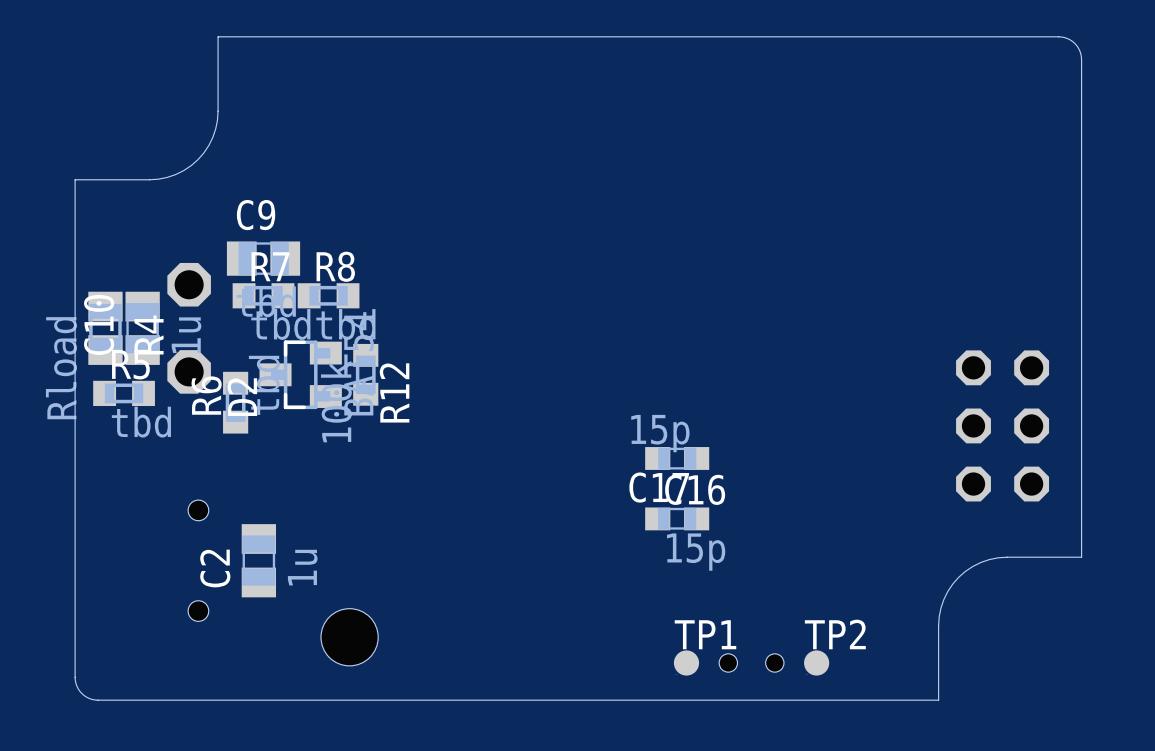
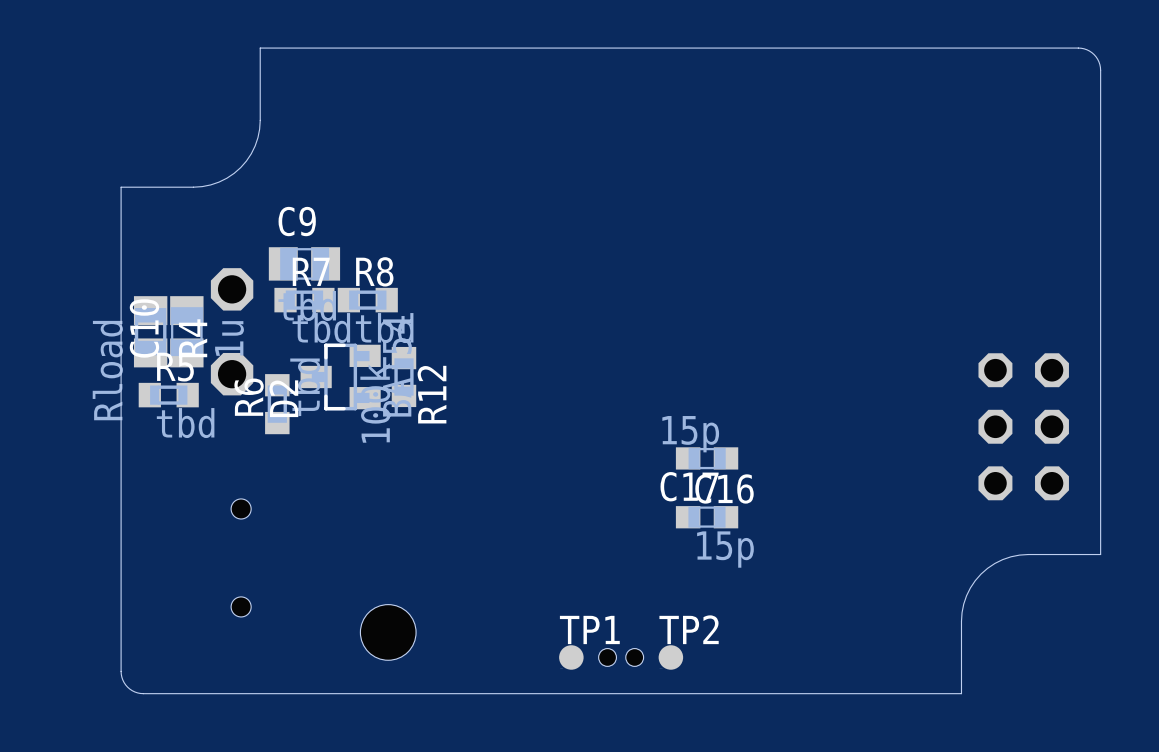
C2: 1u (258, 560) -> none
hole: none -> (607, 657)
hole: none -> (634, 657)
TP1 position: (686, 662) -> (571, 657)
hole: (728, 662) -> none
hole: (774, 662) -> none
TP2 position: (816, 662) -> (670, 657)

